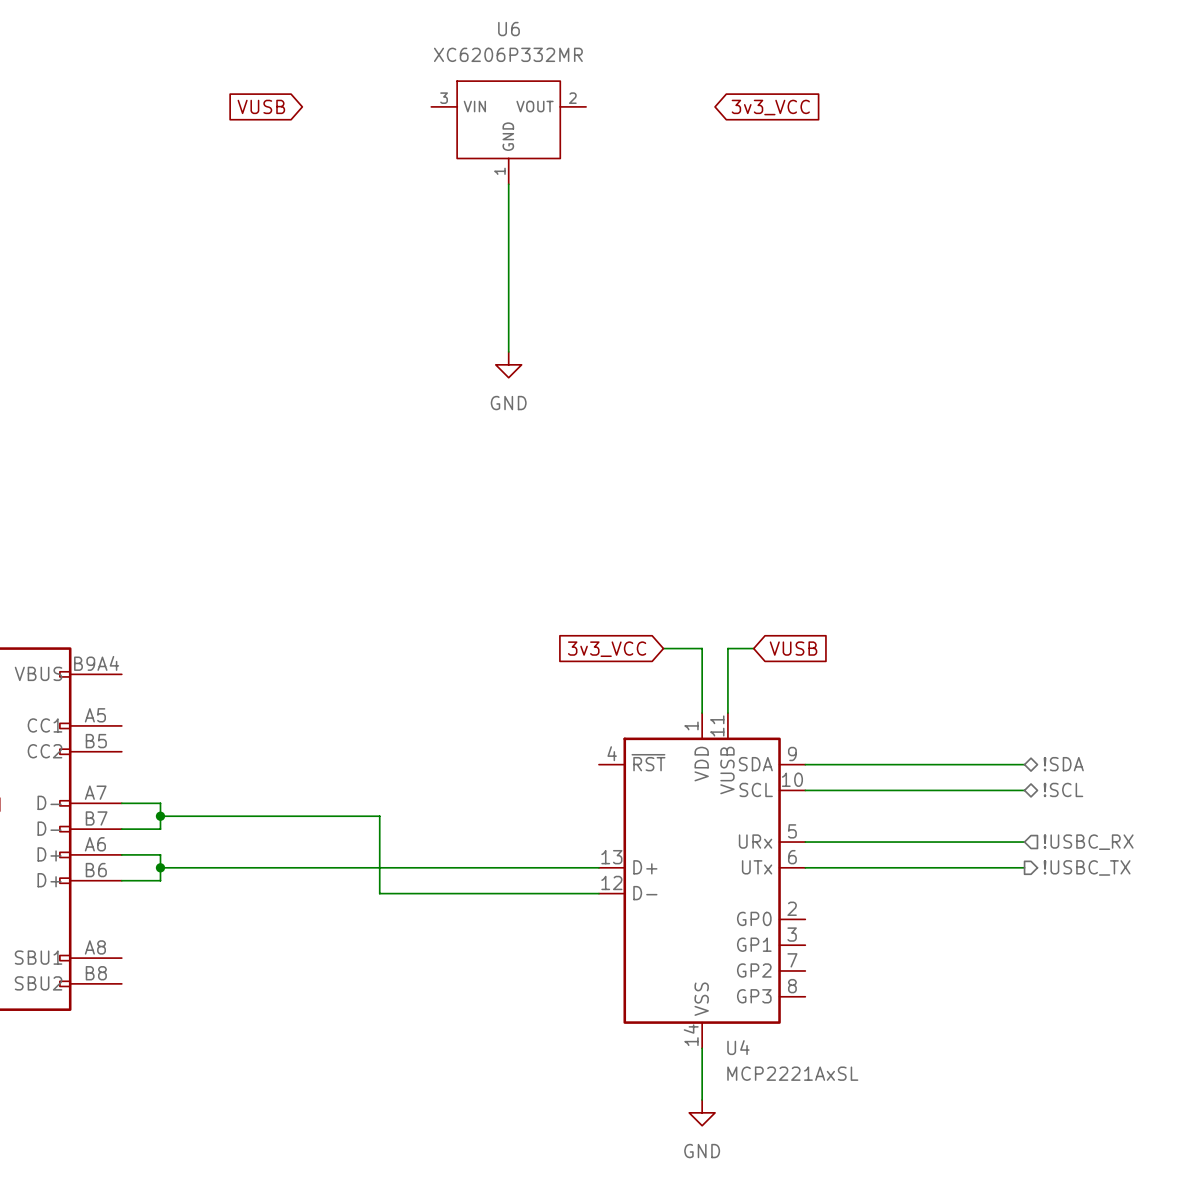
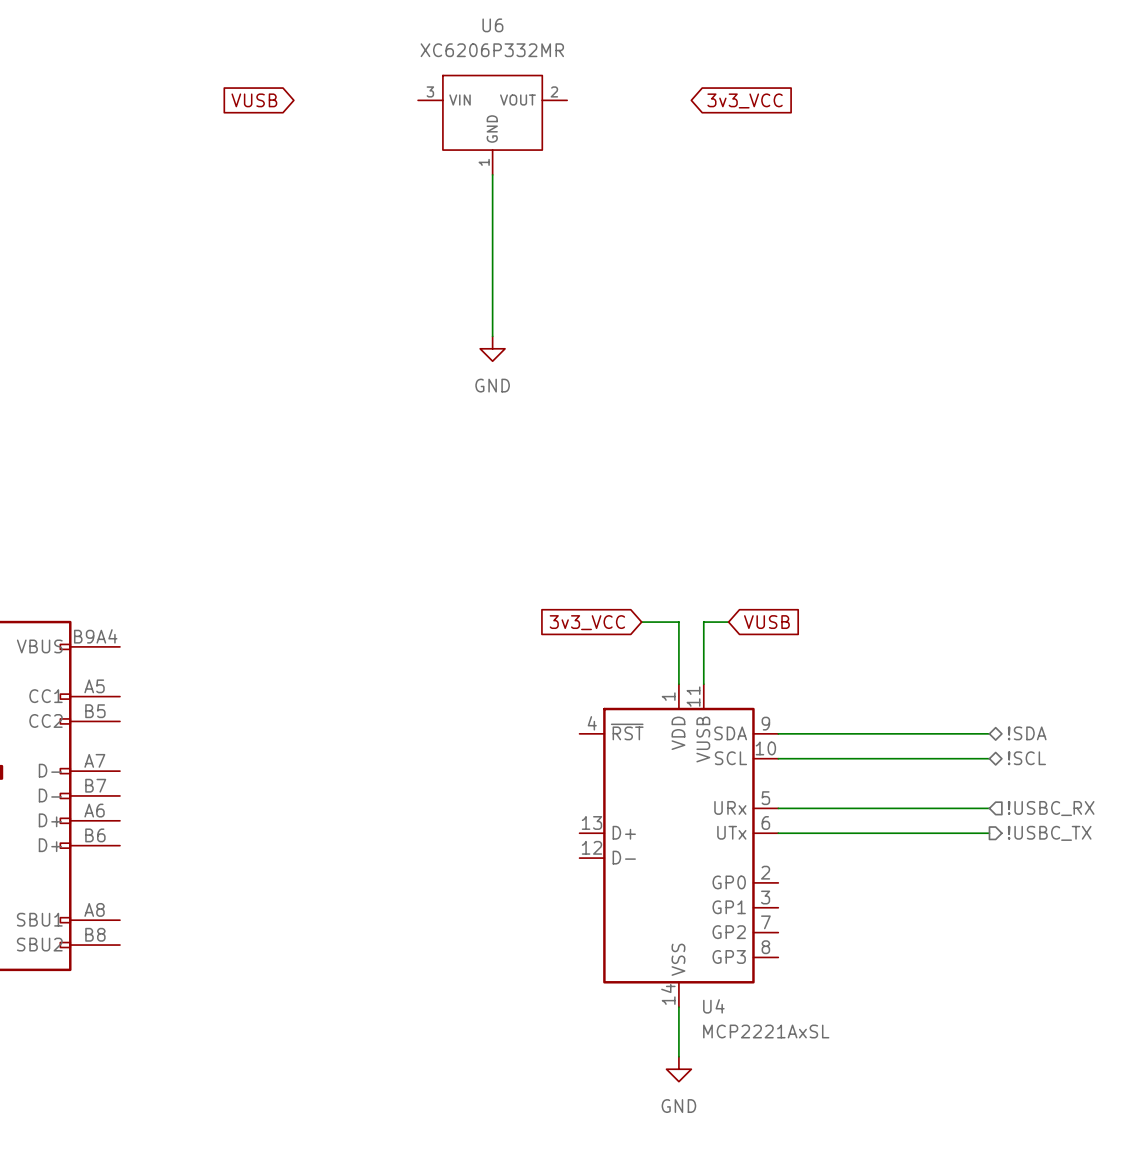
wire: (121, 803) (160, 803) (160, 829) (121, 829) -> none
wire: (160, 816) (379, 816) (379, 893) (598, 893) -> none
junction: (160, 816) -> none
wire: (121, 854) (160, 854) (160, 880) (121, 880) -> none
wire: (160, 867) (598, 867) -> none
junction: (160, 867) -> none

